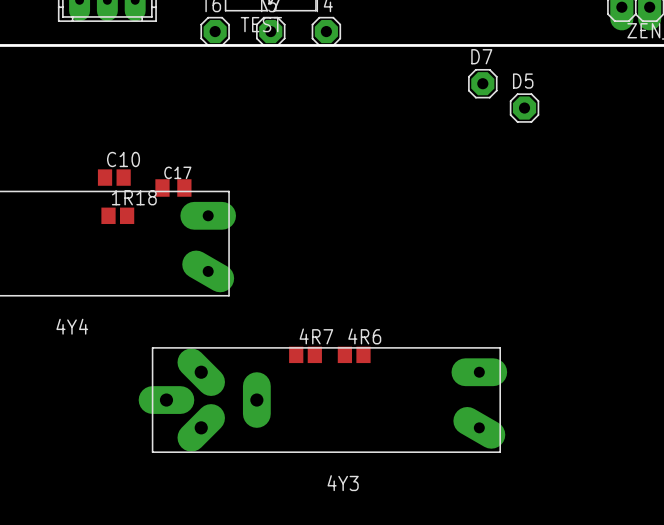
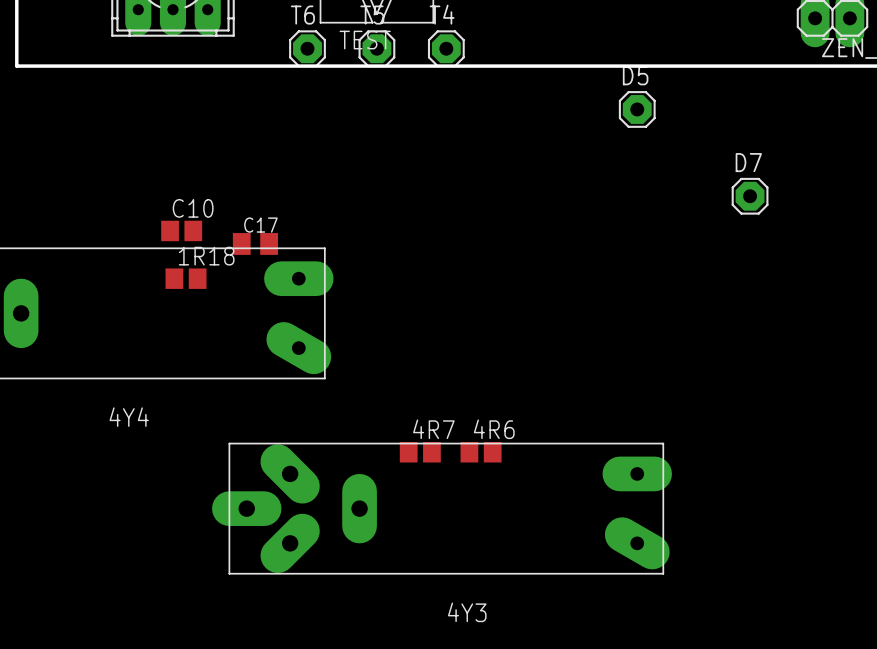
D7 position: (482, 83) -> (750, 196)
D5 position: (524, 108) -> (637, 109)

